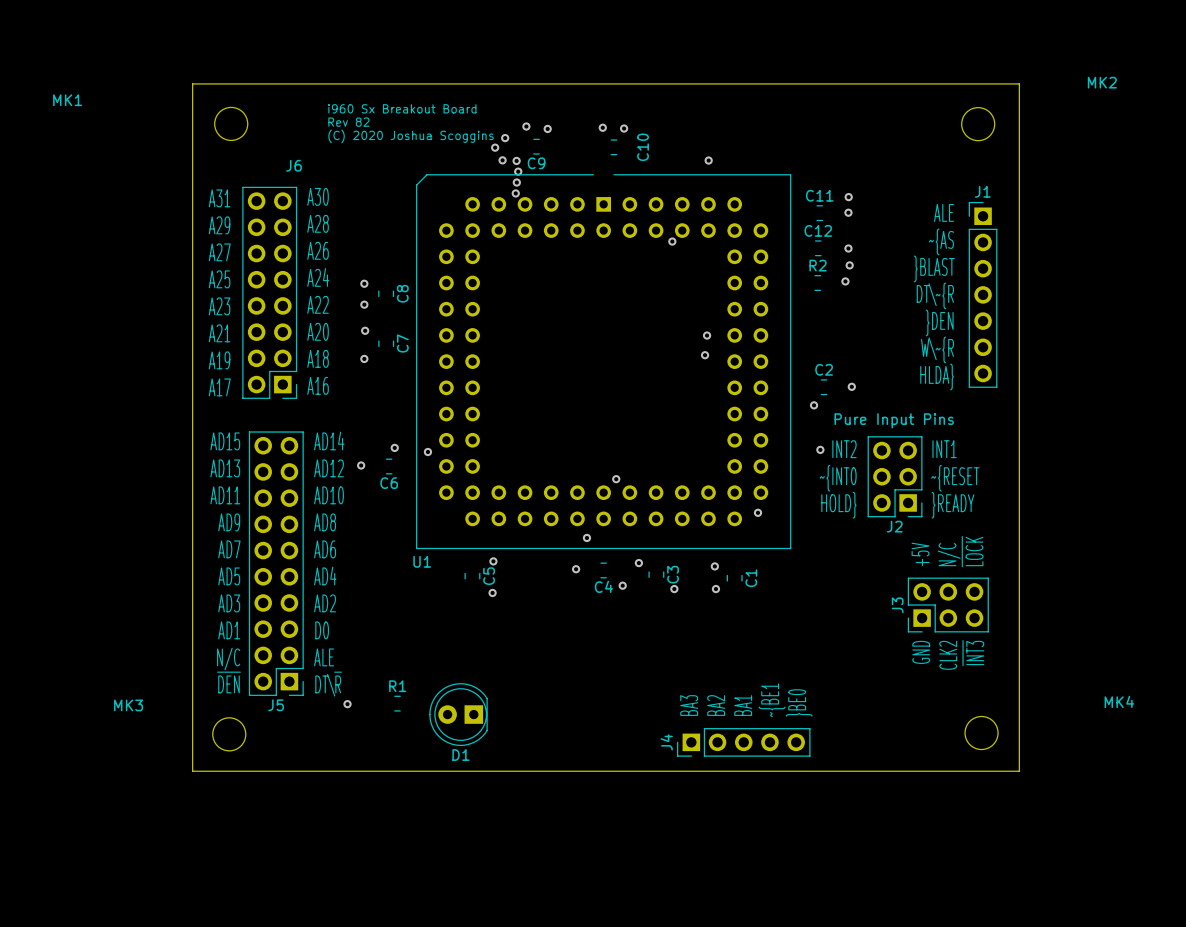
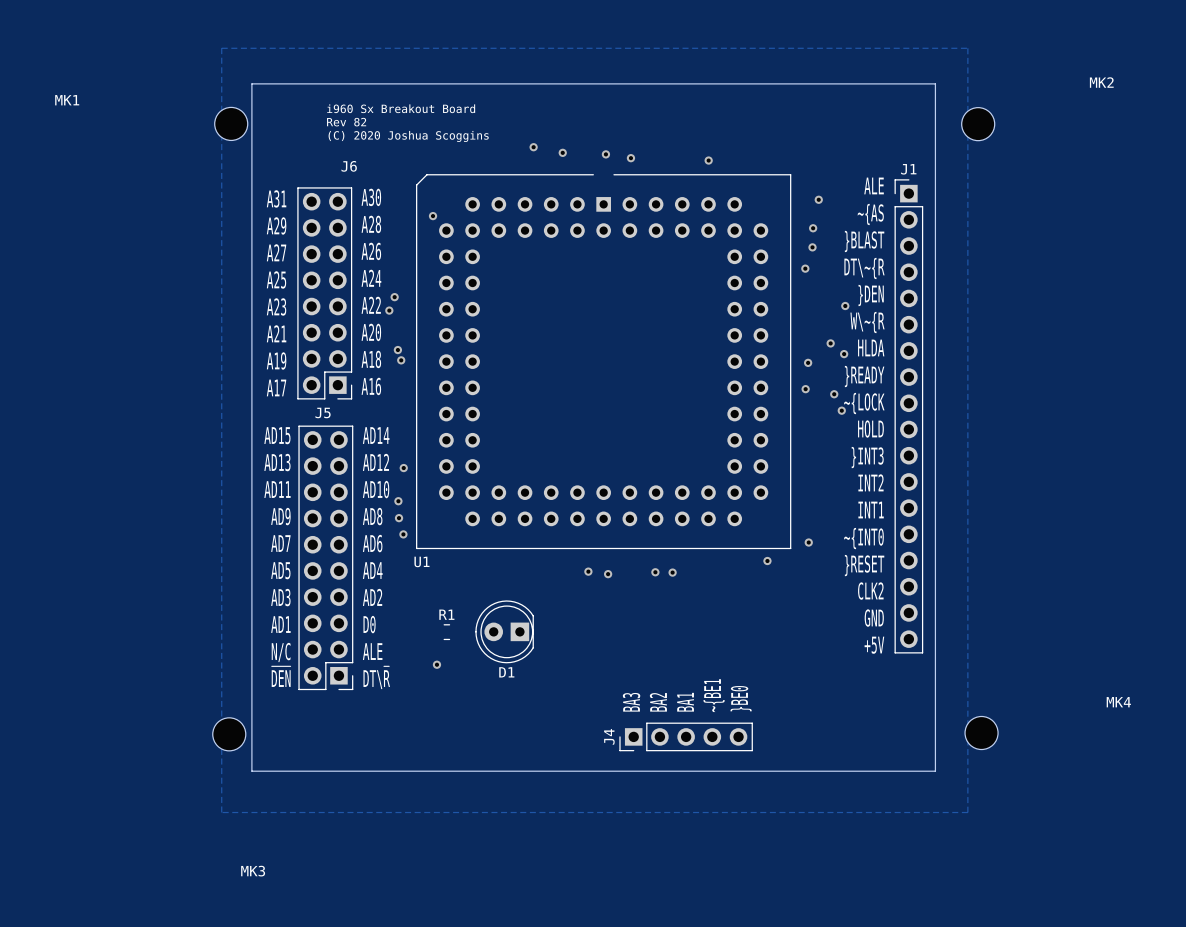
zone outline: none -> (221, 48) (221, 812) (967, 812) (967, 48) (221, 48)
board edge: (251, 83) (192, 83) (192, 771) (1019, 771) (1019, 83) (935, 83) -> (251, 83) (251, 771) (935, 771) (935, 83)
via: (526, 126) -> none
via: (602, 127) -> none
via: (547, 128) -> none
via: (624, 128) -> none
via: (505, 138) -> none
C9: (536, 146) -> none
via: (495, 147) -> none
via: none -> (533, 147)
C10: (613, 147) -> none
via: none -> (562, 152)
via: none -> (605, 154)
via: none -> (630, 158)
via: (502, 160) -> none
via: (516, 160) -> none
via: (518, 171) -> none
via: (516, 182) -> none
J1 name position: J1 (982, 191) -> J1 (908, 169)
via: (515, 193) -> none
text position: A30 (318, 196) -> A30 (371, 197)
via: (848, 197) -> none
text position: A31 (219, 198) -> A31 (276, 198)
via: none -> (818, 199)
J1 footprint: [968, 201, 998, 388] -> [894, 179, 924, 654]
via: (848, 212) -> none
text position: ALE (943, 212) -> ALE (874, 185)
C11: (819, 213) -> none
via: none -> (433, 216)
text position: A28 (318, 223) -> A28 (371, 224)
text position: A29 (219, 225) -> A29 (276, 225)
via: none -> (813, 228)
via: (672, 241) -> none
text position: ~{AS (941, 241) -> ~{AS (870, 214)
via: none -> (812, 247)
C12: (818, 248) -> none
via: (848, 248) -> none
text position: A26 (318, 250) -> A26 (371, 251)
text position: A27 (219, 252) -> A27 (276, 252)
via: (849, 265) -> none
via: none -> (805, 268)
text position: }BLAST (934, 268) -> }BLAST (864, 241)
text position: A24 (318, 277) -> A24 (371, 278)
text position: A25 (219, 279) -> A25 (276, 279)
via: (845, 281) -> none
via: (364, 283) -> none
R2: (817, 283) -> none
J6 position: (269, 292) -> (324, 293)
C8: (386, 293) -> none
text position: DT\~{R (935, 295) -> DT\~{R (864, 268)
via: none -> (394, 297)
text position: A22 (318, 304) -> A22 (371, 305)
via: (364, 304) -> none
text position: A23 (219, 306) -> A23 (276, 306)
via: none -> (845, 306)
via: none -> (389, 310)
text position: }DEN (939, 322) -> }DEN (871, 295)
via: (365, 330) -> none
text position: A20 (318, 331) -> A20 (371, 332)
text position: A21 (219, 333) -> A21 (276, 333)
via: (707, 335) -> none
C7: (386, 343) -> none
via: none -> (830, 343)
text: none -> HLDA (871, 347)
text position: W\~{R (937, 349) -> W\~{R (867, 322)
via: none -> (397, 350)
via: none -> (844, 354)
via: (705, 355) -> none
text position: A18 (318, 358) -> A18 (371, 359)
via: (364, 358) -> none
text position: A19 (219, 360) -> A19 (276, 360)
via: none -> (401, 360)
via: none -> (808, 362)
text: HLDA} (937, 376) -> none
text position: A16 (318, 385) -> A16 (371, 386)
via: (851, 386) -> none
text position: A17 (219, 387) -> A17 (276, 387)
C2: (824, 387) -> none
via: none -> (805, 389)
via: none -> (834, 394)
text: none -> ~{LOCK (864, 403)
via: (814, 405) -> none
via: none -> (841, 410)
text: none -> HOLD (870, 429)
text position: AD14 (329, 440) -> AD14 (376, 435)
text position: AD15 (225, 441) -> AD15 (277, 435)
via: (394, 447) -> none
via: (820, 449) -> none
text position: INT2 (844, 449) -> INT2 (870, 482)
text position: INT1 (944, 449) -> INT1 (871, 510)
via: (427, 452) -> none
text: none -> }INT3 (867, 457)
via: (361, 465) -> none
C6: (389, 466) -> none
text position: AD13 (225, 468) -> AD13 (277, 462)
text position: AD12 (329, 468) -> AD12 (375, 462)
via: none -> (403, 468)
J2: Pure Input Pins (895, 476) -> none
text position: ~{INT0 (838, 478) -> ~{INT0 (863, 538)
text: ~{RESET (955, 478) -> none
via: (616, 479) -> none
text position: AD11 (225, 495) -> AD11 (277, 489)
text position: AD10 (329, 495) -> AD10 (376, 489)
via: none -> (398, 501)
text: HOLD} (838, 505) -> none
text position: }READY (953, 505) -> }READY (864, 376)
via: (757, 512) -> none
via: none -> (399, 518)
text position: AD9 (229, 522) -> AD9 (280, 516)
text position: AD8 (325, 522) -> AD8 (372, 516)
via: none -> (403, 534)
via: (586, 537) -> none
via: none -> (808, 542)
text position: AD7 (229, 549) -> AD7 (280, 543)
text position: AD6 (325, 549) -> AD6 (372, 543)
text: ~{LOCK} (972, 551) -> none
text rotation: 0° (920, 554) -> 90° clockwise (874, 645)
text position: +5V (920, 554) -> +5V (874, 645)
text: N/C (949, 554) -> none
via: (493, 561) -> none
via: none -> (767, 561)
J5 position: (276, 563) -> (325, 557)
via: (638, 563) -> none
via: (714, 566) -> none
text: none -> }RESET (864, 565)
via position: (576, 569) -> (588, 571)
C4: (603, 570) -> none
via: none -> (655, 572)
via: none -> (672, 572)
via: none -> (608, 574)
C3: (656, 574) -> none
text position: AD4 (325, 575) -> AD4 (372, 570)
text position: AD5 (229, 576) -> AD5 (280, 570)
C5: (472, 576) -> none
C1: (734, 578) -> none
via: (622, 585) -> none
via: (674, 589) -> none
via: (715, 589) -> none
via: (492, 592) -> none
text position: AD3 (229, 603) -> AD3 (280, 597)
text position: AD2 (325, 603) -> AD2 (372, 597)
J3: (948, 605) -> none
text position: AD1 (229, 630) -> AD1 (280, 624)
text position: D0 (322, 630) -> D0 (369, 624)
text rotation: 0° (921, 652) -> 90° clockwise (874, 618)
text position: GND (921, 652) -> GND (874, 618)
text: ~{INT3} (973, 653) -> none
text rotation: 0° (948, 655) -> 90° clockwise (870, 591)
text position: CLK2 (948, 655) -> CLK2 (870, 591)
text position: ALE (324, 657) -> ALE (372, 651)
text position: N/C (228, 659) -> N/C (281, 652)
via: none -> (436, 664)
text position: ~{DEN} (229, 682) -> ~{DEN} (281, 676)
D1 footprint: [429, 683, 488, 747] -> [475, 600, 534, 664]
text position: DT\~{R} (328, 684) -> DT\~{R} (376, 677)
text position: ~{BE1 (772, 700) -> ~{BE1 (714, 695)
text position: }BE0 (799, 702) -> }BE0 (741, 698)
R1 position: (397, 703) -> (446, 632)
via: (347, 704) -> none
MK3 name position: MK3 (128, 705) -> MK3 (253, 871)
J5 name position: J5 (276, 705) -> J5 (323, 412)
text position: BA3 (689, 705) -> BA3 (631, 702)
text position: BA2 (716, 705) -> BA2 (658, 702)
text position: BA1 (743, 705) -> BA1 (685, 702)
J4 position: (743, 742) -> (686, 736)

